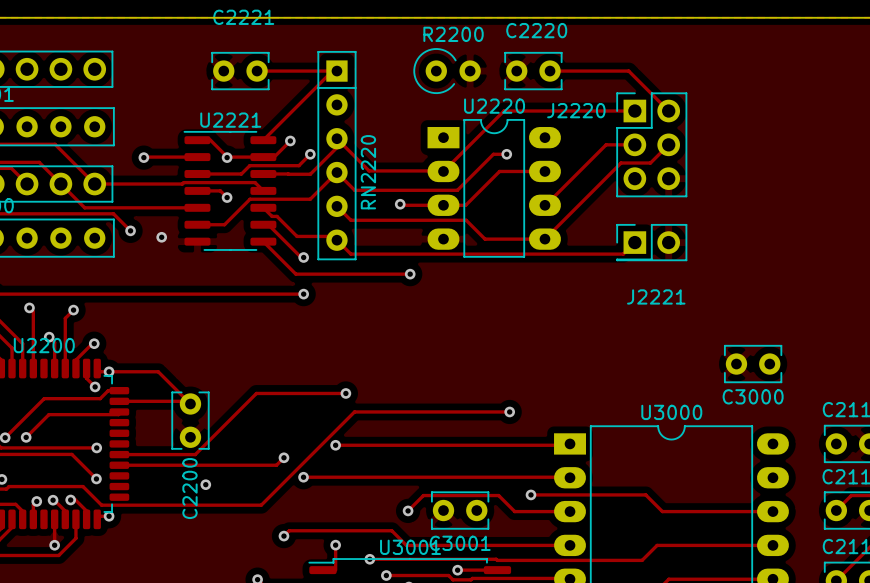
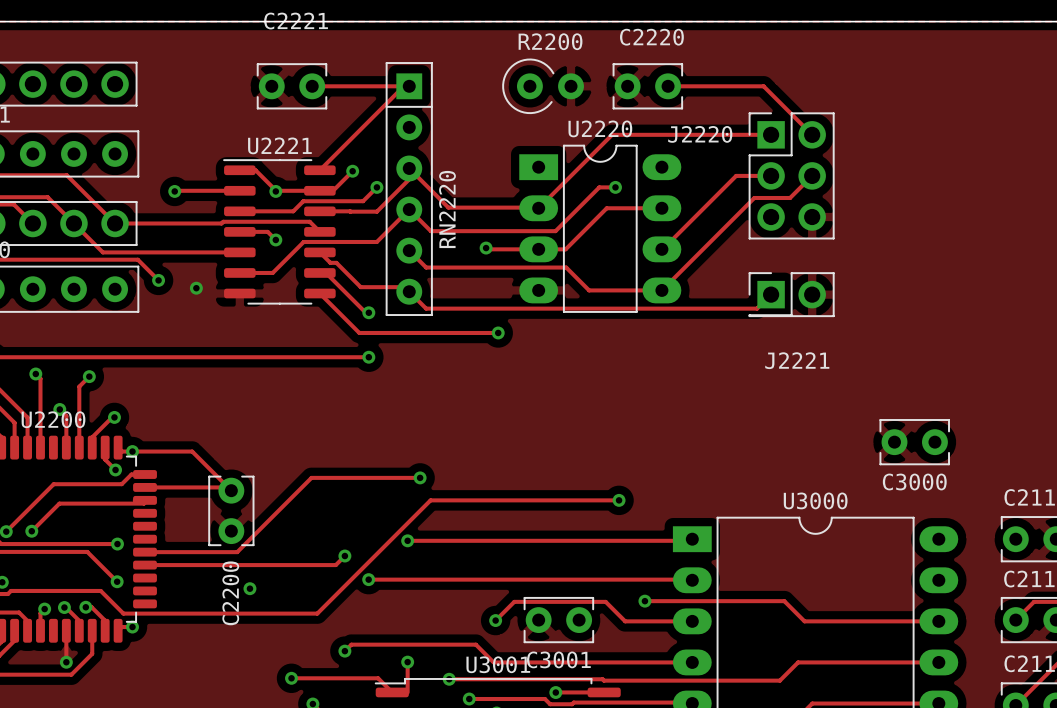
track: none -> (291, 678) (378, 678) (392, 692)
via: none -> (291, 678)

